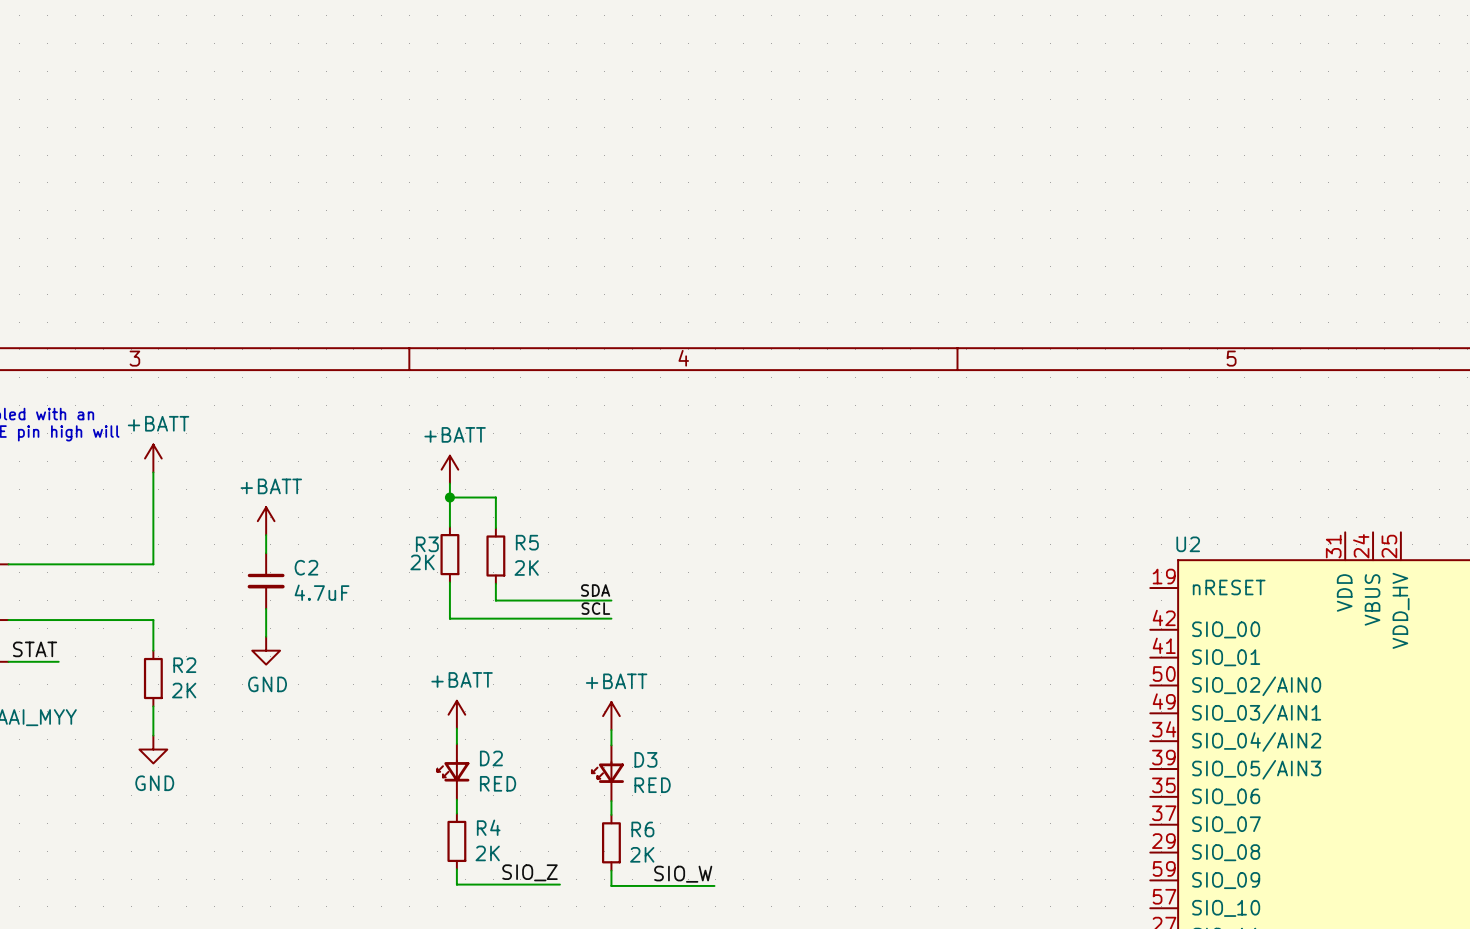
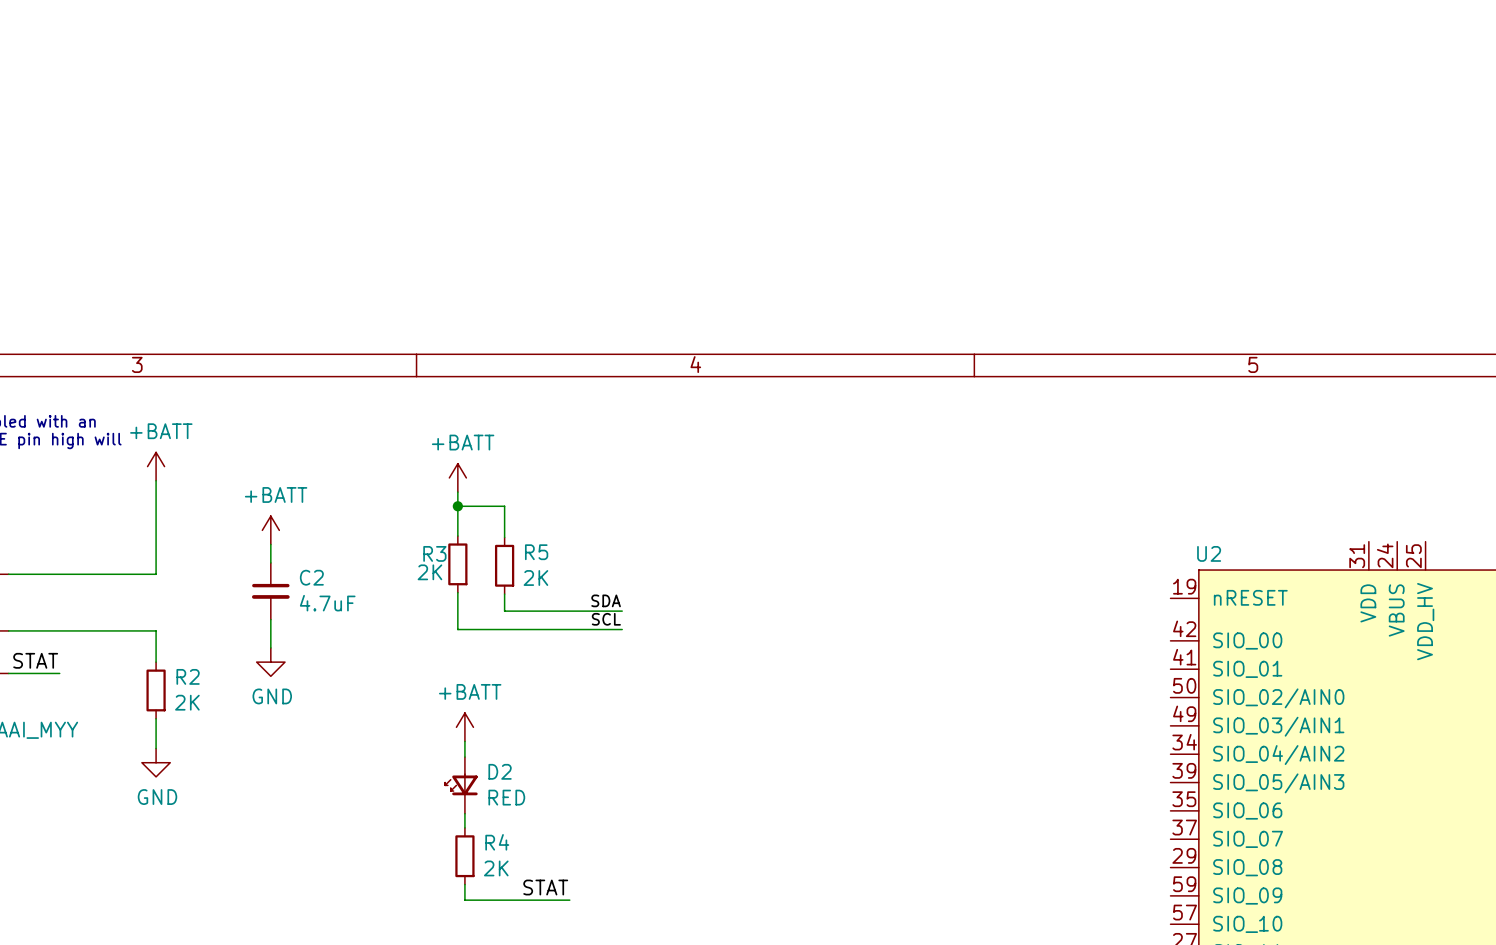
power symbol: +BATT (611, 716) -> none
wire: (611, 730) (611, 745) -> none
D3: RED (607, 773) -> none
wire: (611, 801) (611, 814) -> none
R6: 2K (611, 842) -> none
wire: (611, 870) (611, 885) (714, 885) -> none
label: SIO_Z (529, 872) -> STAT (545, 887)
label: SIO_W (683, 874) -> none

